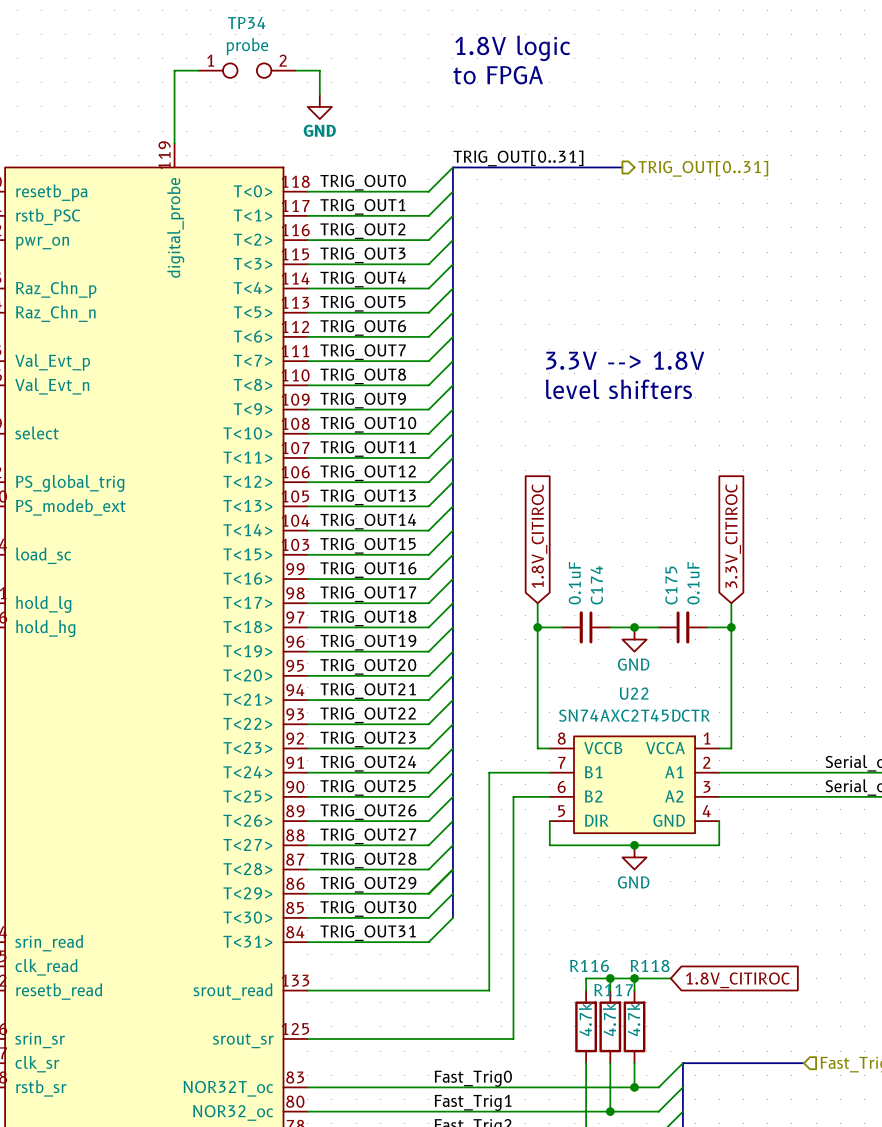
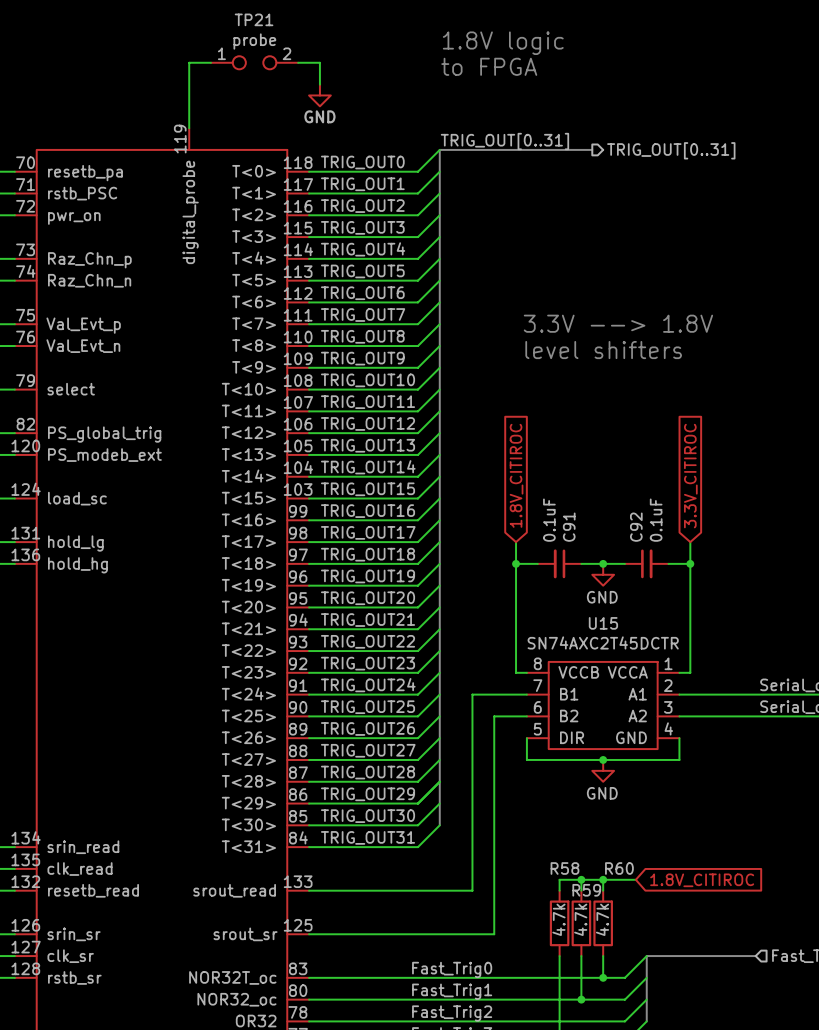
TP34 name: TP34 (246, 22) -> TP21 (254, 19)
C174 name: C174 (596, 585) -> C91 (569, 527)
C175 name: C175 (671, 585) -> C92 (636, 527)
U22 name: U22 (634, 693) -> U15 (603, 623)
R116 name: R116 (589, 965) -> R58 (564, 868)
R118 name: R118 (650, 965) -> R60 (619, 868)
R117 name: R117 (613, 990) -> R59 (586, 890)

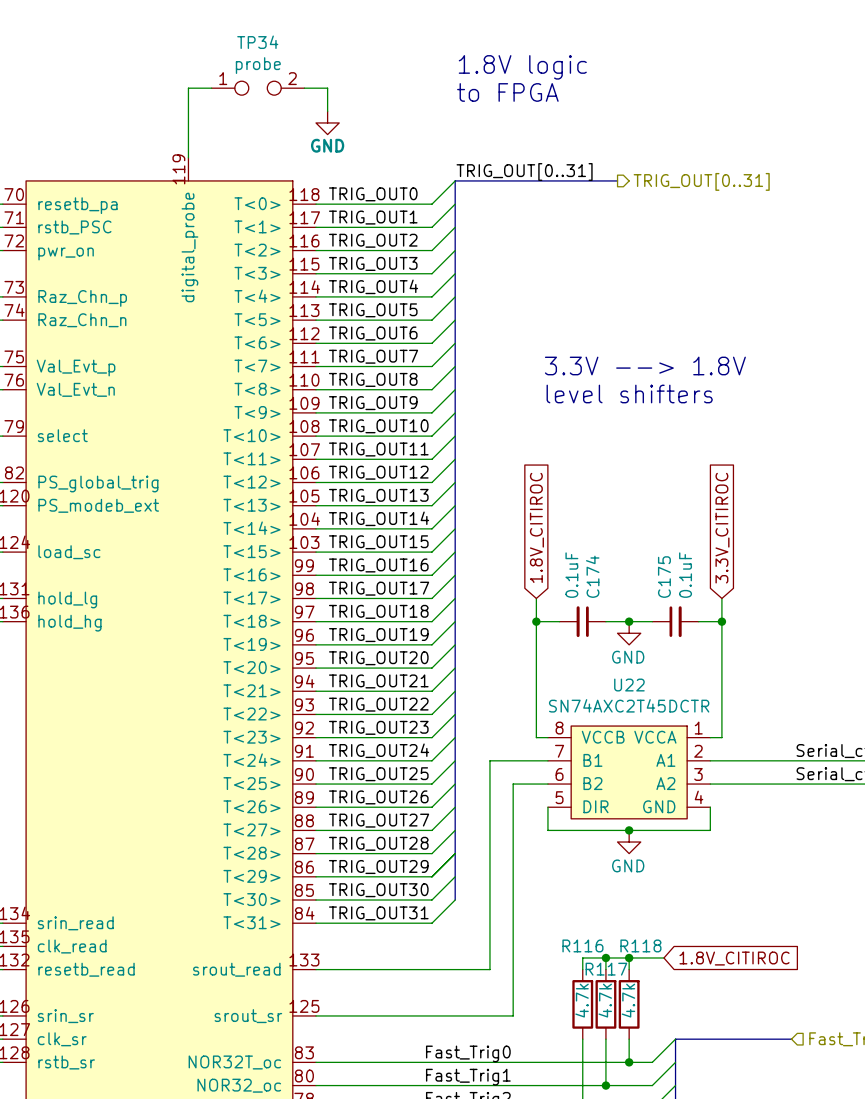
TP21 name: TP21 (254, 19) -> TP34 (257, 42)
C91 name: C91 (569, 527) -> C174 (592, 576)
C92 name: C92 (636, 527) -> C175 (664, 577)
U15 name: U15 (603, 623) -> U22 (629, 685)
R58 name: R58 (564, 868) -> R116 (582, 945)
R60 name: R60 (619, 868) -> R118 (640, 945)
R59 name: R59 (586, 890) -> R117 (606, 969)

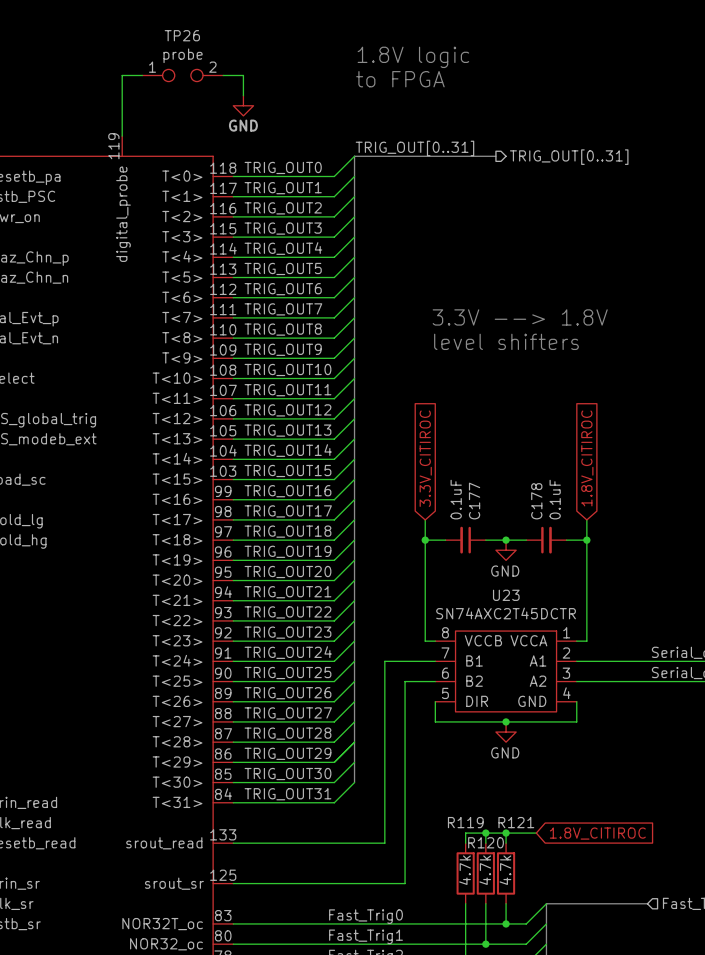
TP34 name: TP34 (257, 42) -> TP26 (182, 35)
global label: 1.8V_CITIROC (536, 527) -> 3.3V_CITIROC (425, 458)
global label: 3.3V_CITIROC (722, 528) -> 1.8V_CITIROC (587, 458)
C174 name: C174 (592, 576) -> C177 (474, 501)
C175 name: C175 (664, 577) -> C178 (536, 501)
U22 name: U22 (629, 685) -> U23 (506, 595)
R116 name: R116 (582, 945) -> R119 (465, 822)
R118 name: R118 (640, 945) -> R121 (516, 822)
R117 name: R117 (606, 969) -> R120 (486, 842)

